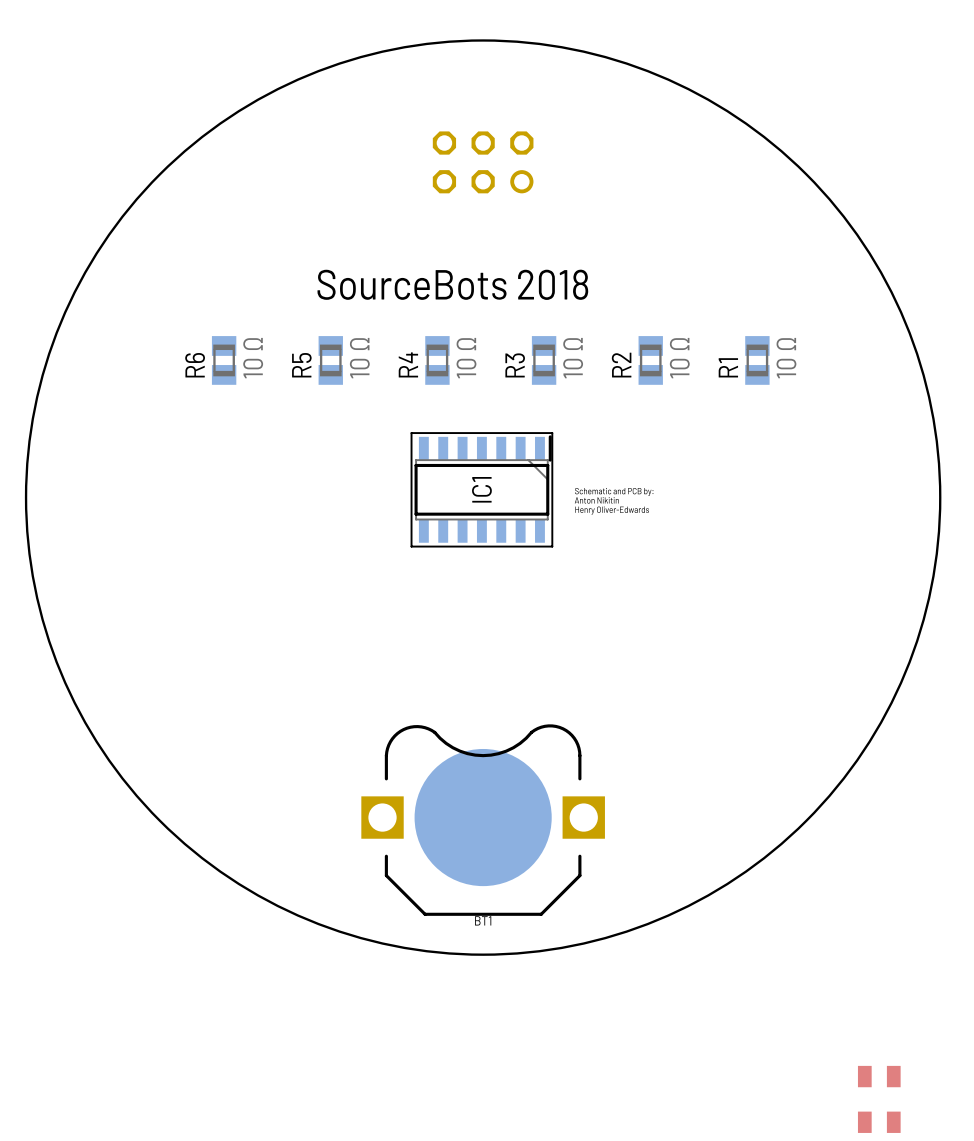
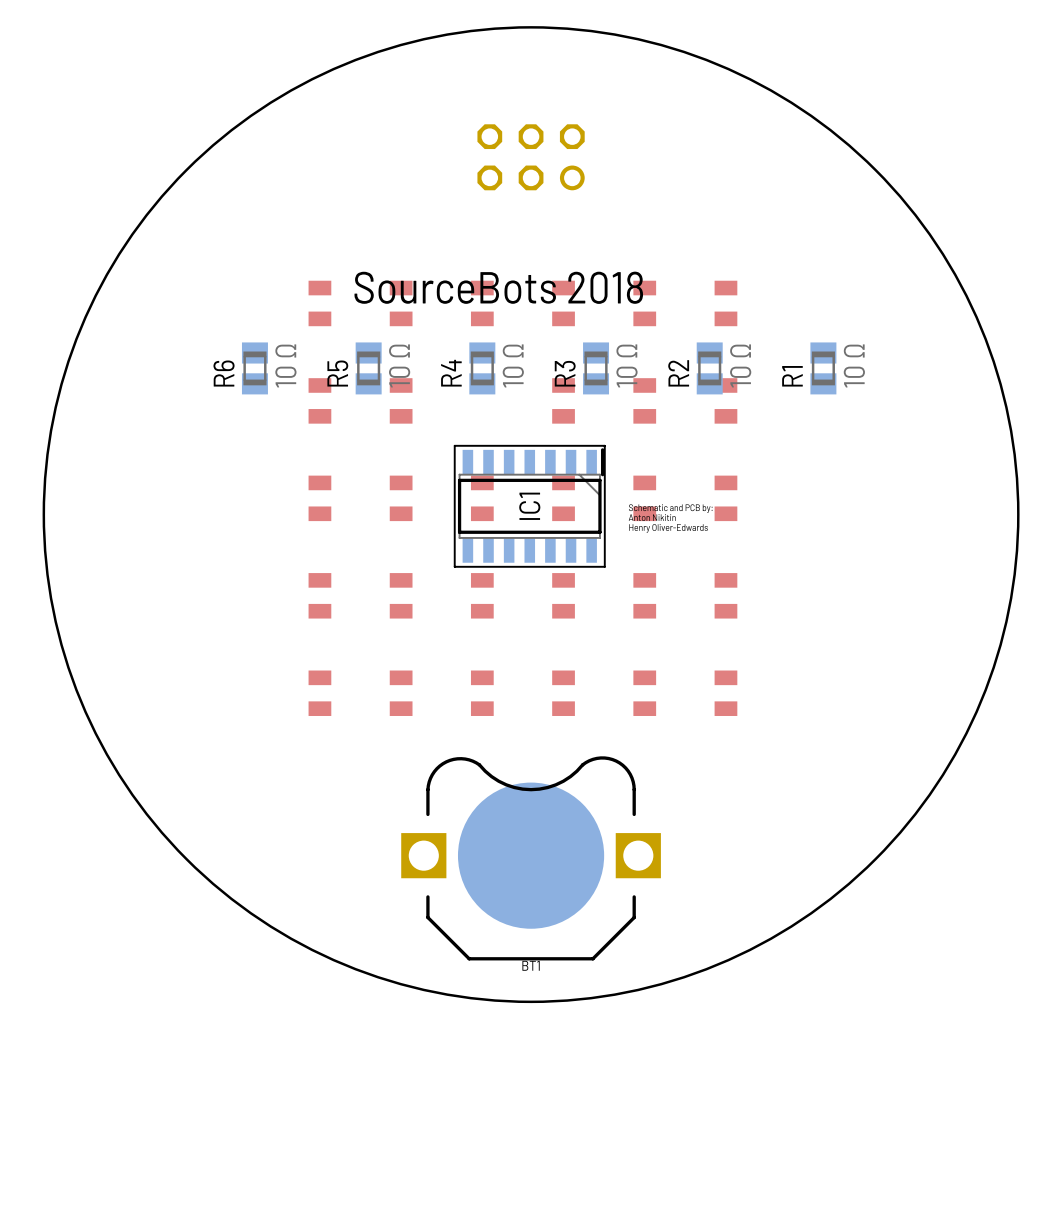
part: none -> (319, 303)
part: none -> (401, 303)
part: none -> (482, 303)
part: none -> (563, 303)
part: none -> (644, 303)
part: none -> (725, 303)
part: none -> (319, 400)
part: none -> (401, 400)
part: none -> (563, 400)
part: none -> (644, 400)
part: none -> (725, 400)
part: none -> (319, 498)
part: none -> (401, 498)
part: none -> (482, 498)
part: none -> (563, 498)
part: none -> (644, 498)
part: none -> (725, 498)
part: none -> (319, 595)
part: none -> (401, 595)
part: none -> (482, 595)
part: none -> (563, 595)
part: none -> (644, 595)
part: none -> (725, 595)
part: none -> (319, 693)
part: none -> (401, 693)
part: none -> (482, 693)
part: none -> (563, 693)
part: none -> (644, 693)
part: none -> (725, 693)
part: (879, 1076) -> none
part: (879, 1122) -> none

